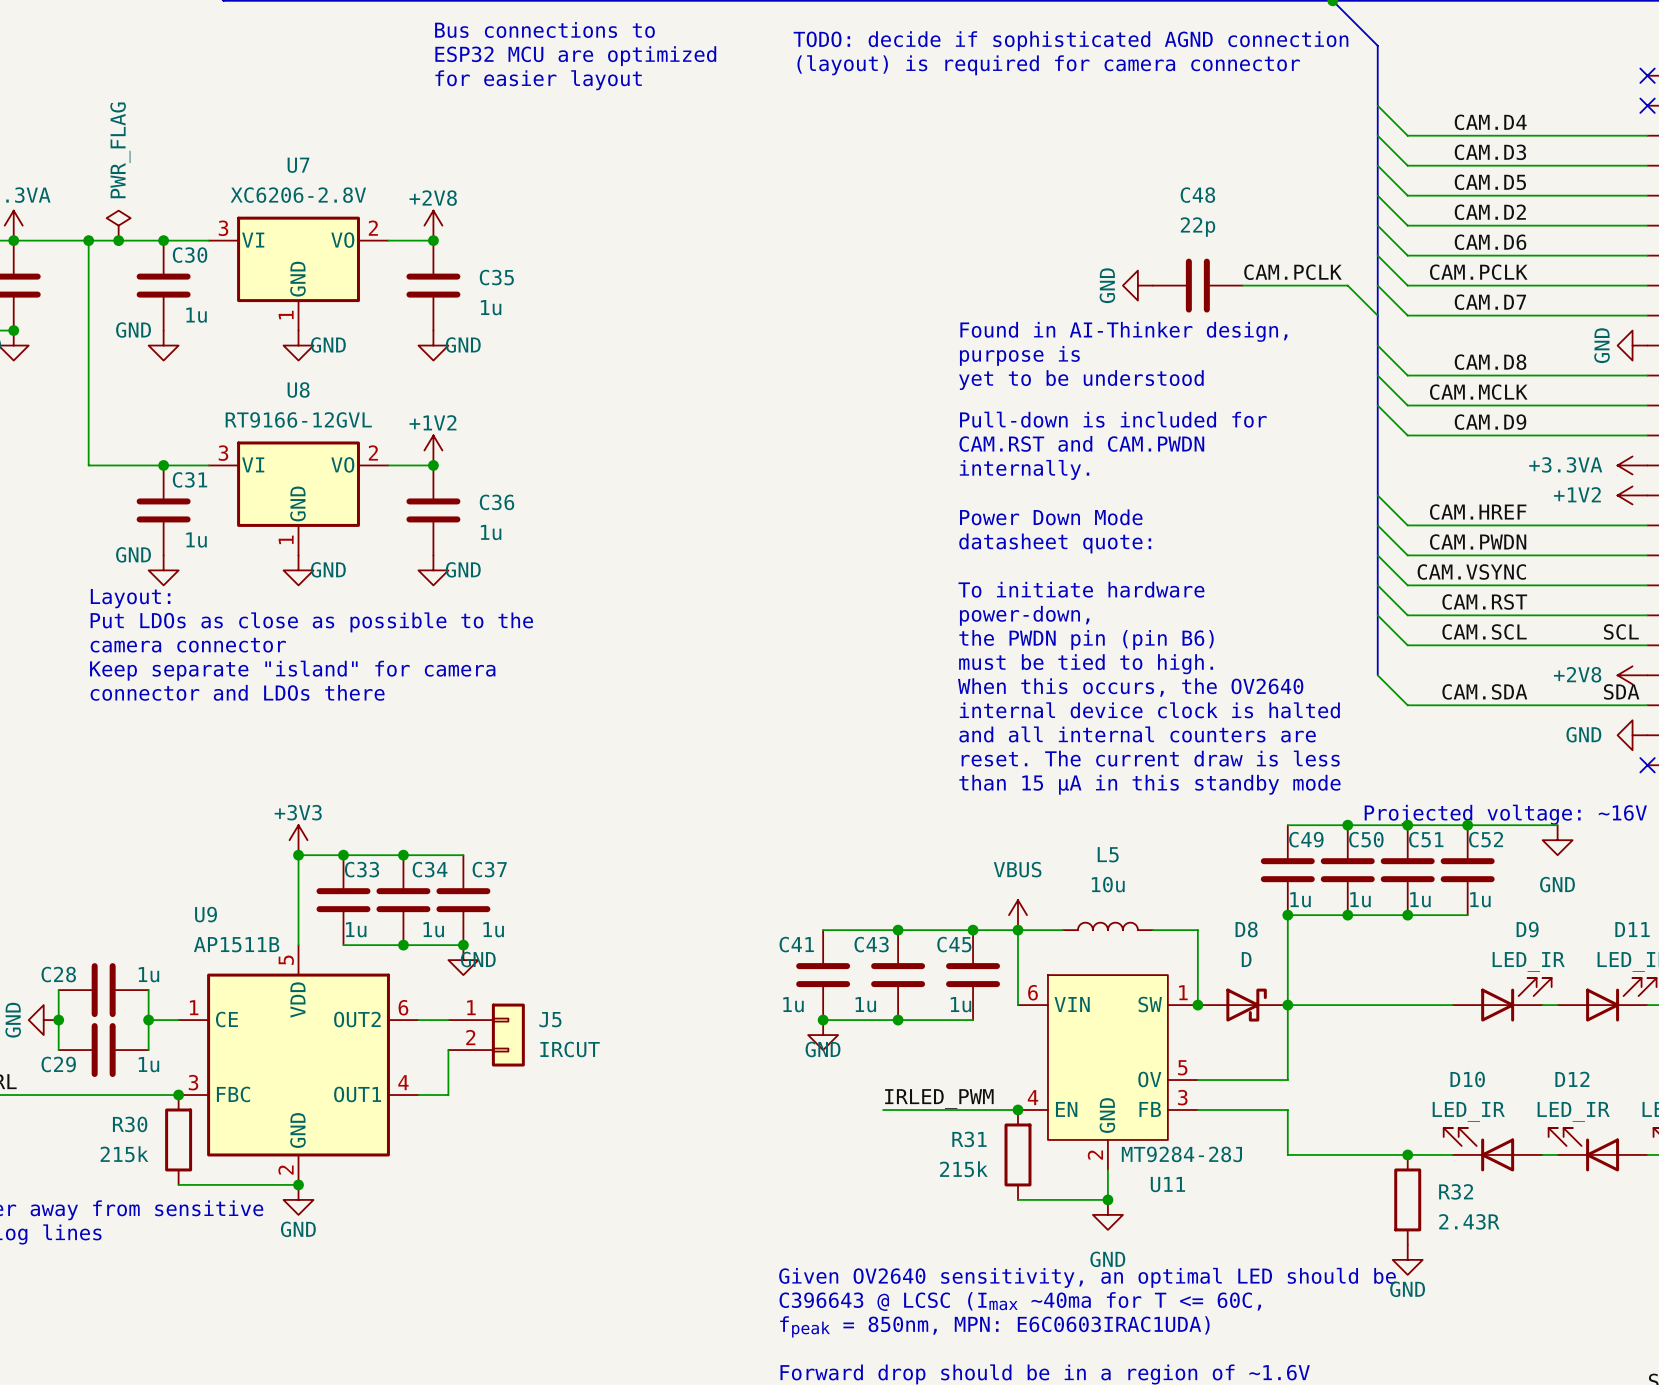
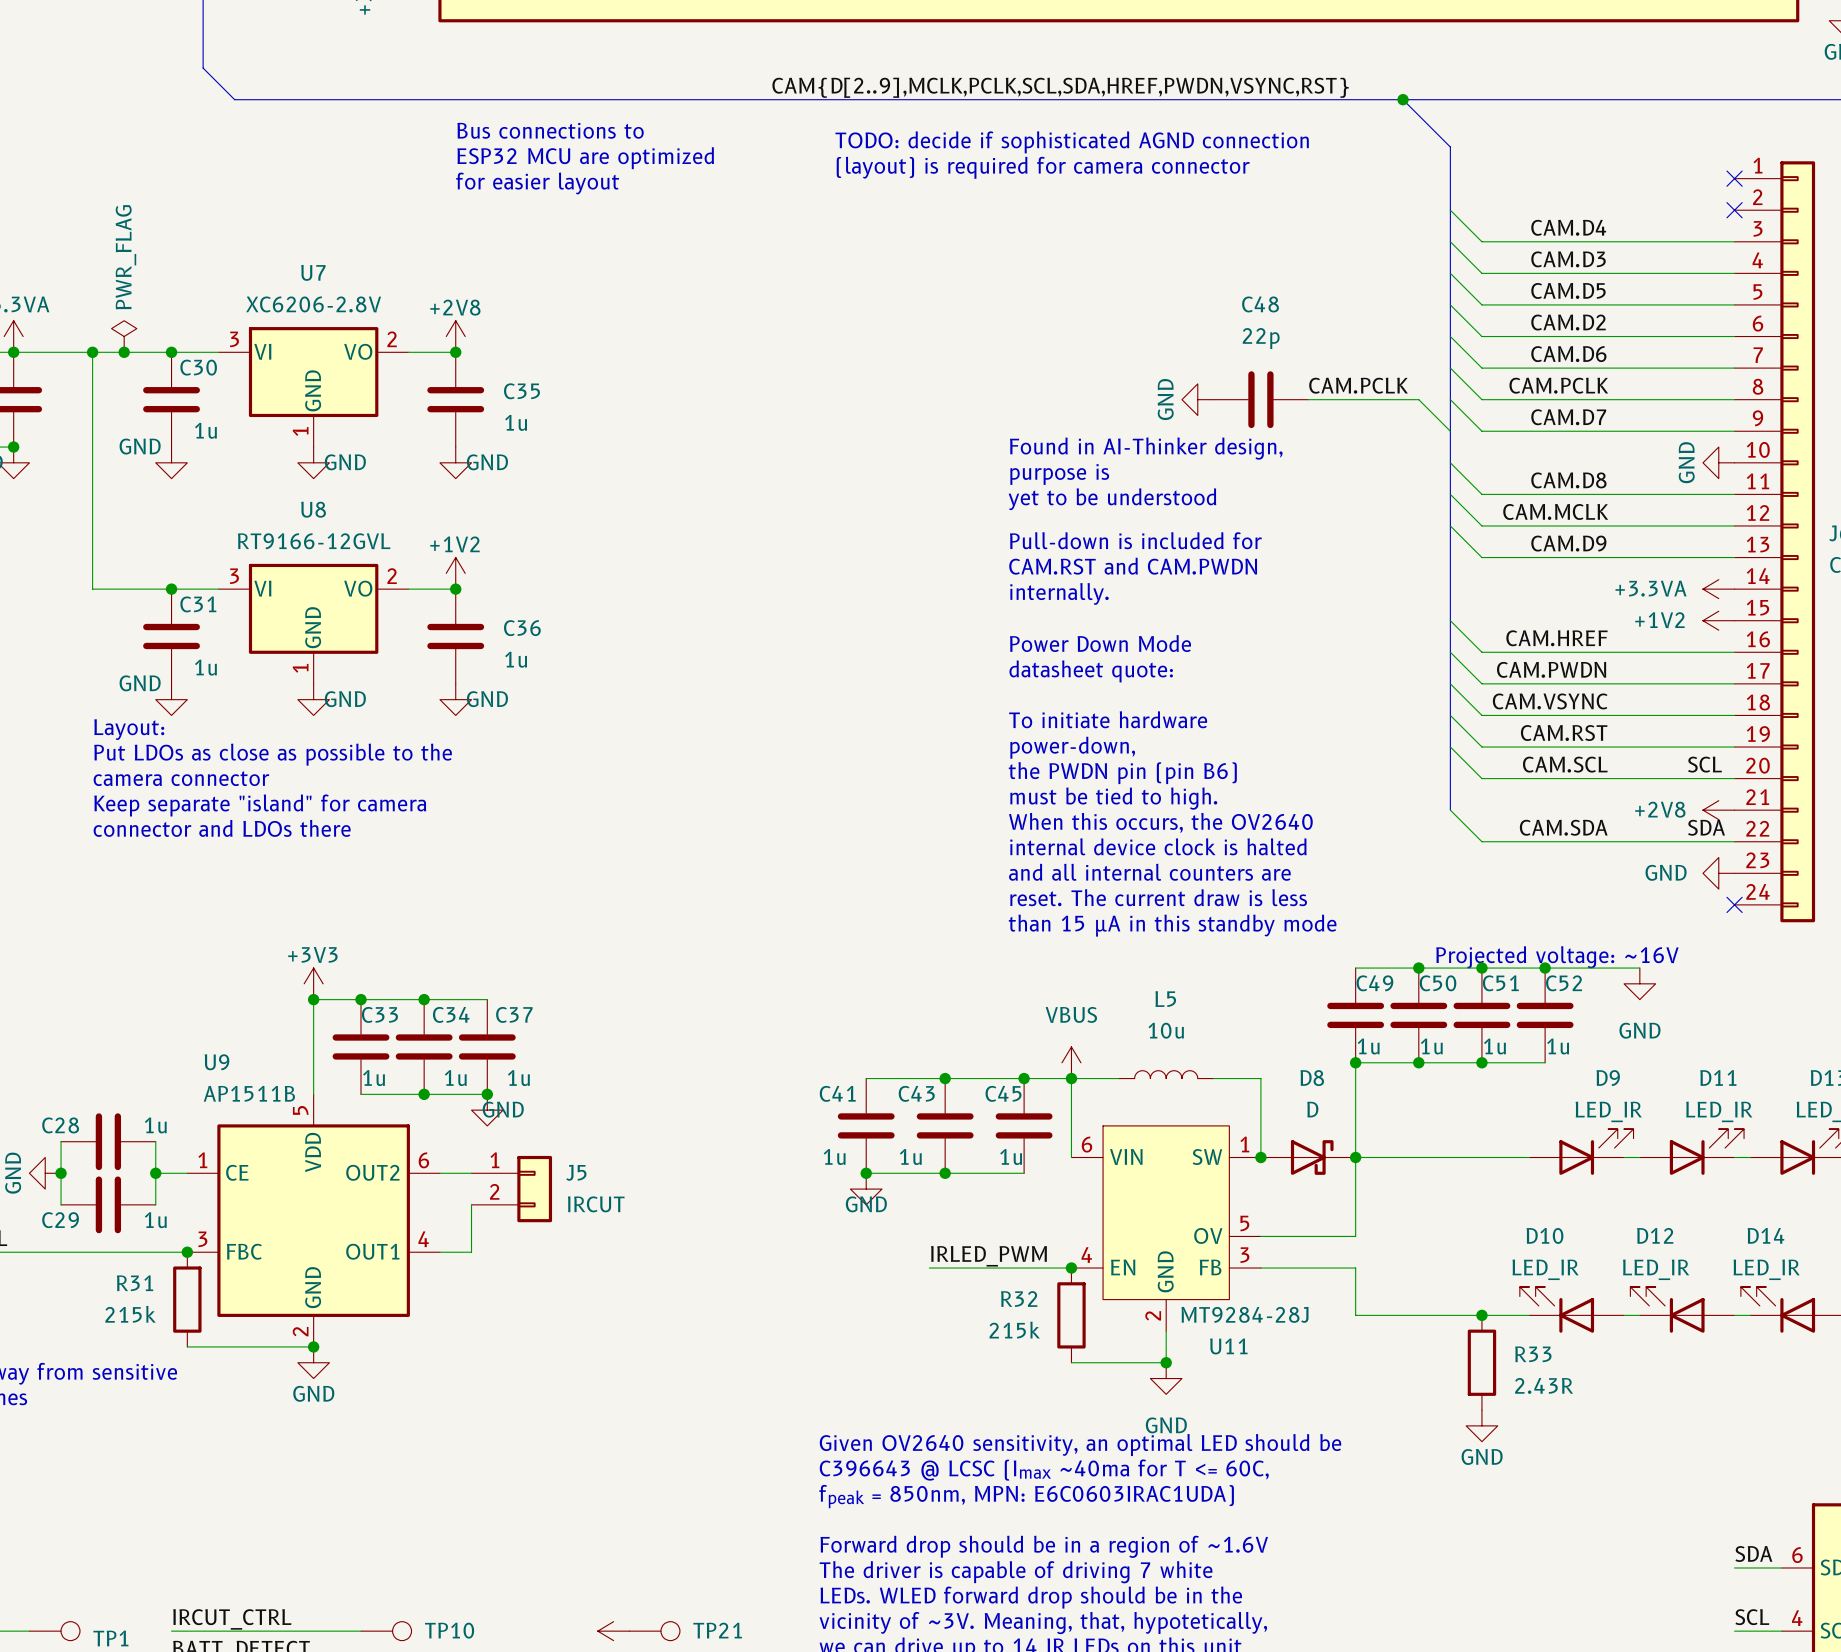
R30 name: R30 (130, 1124) -> R31 (135, 1283)
R31 name: R31 (969, 1139) -> R32 (1019, 1299)
R32 name: R32 (1456, 1191) -> R33 (1533, 1354)

